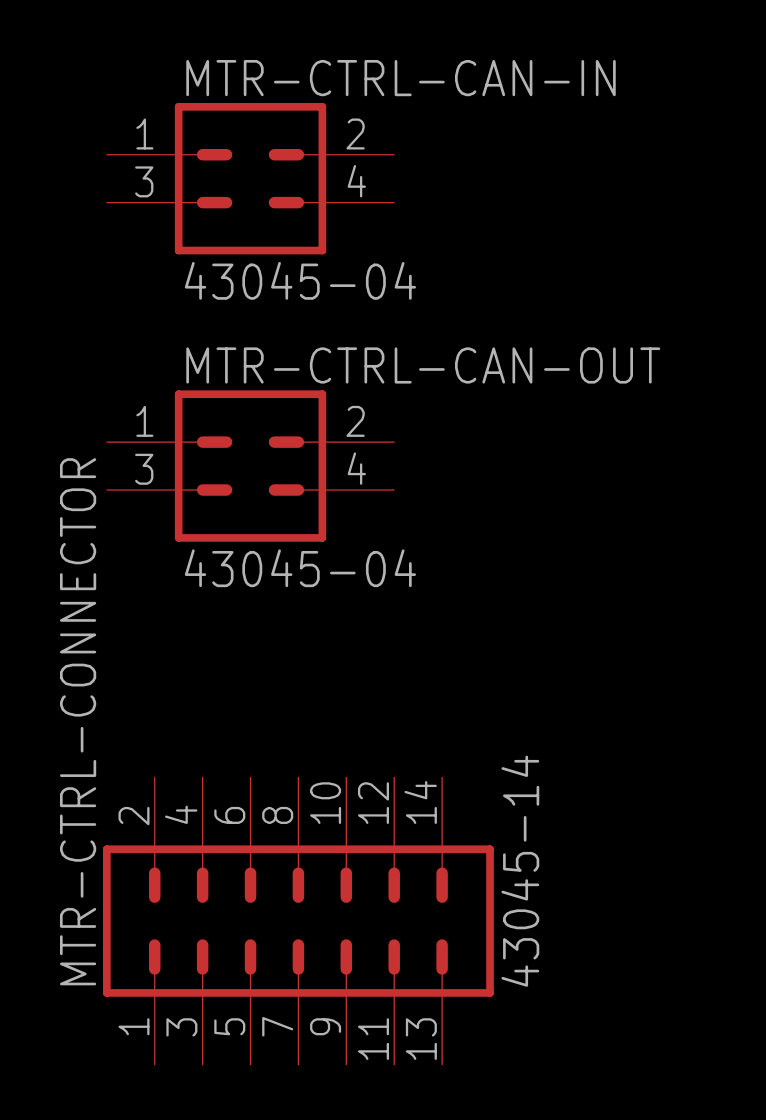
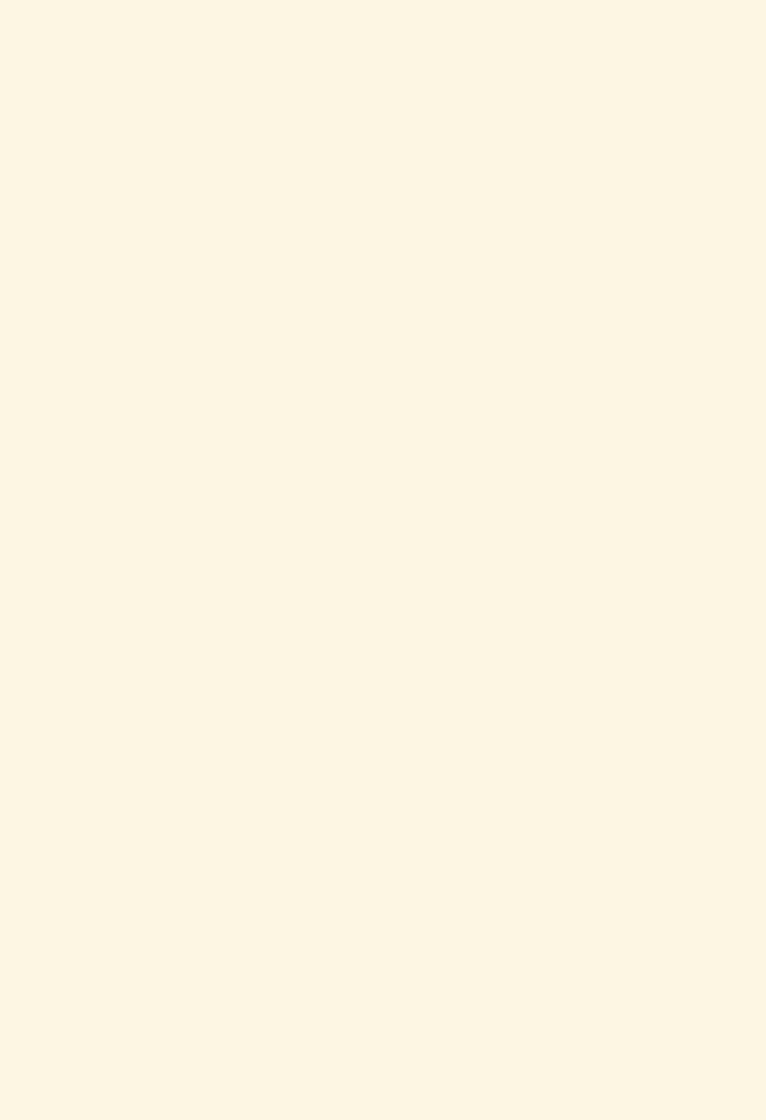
MTR-CTRL-CAN-IN: 43045-04 (250, 178) -> none
MTR-CTRL-CAN-OUT: 43045-04 (250, 466) -> none
MTR-CTRL-CONNECTOR: 43045-14 (298, 921) -> none

